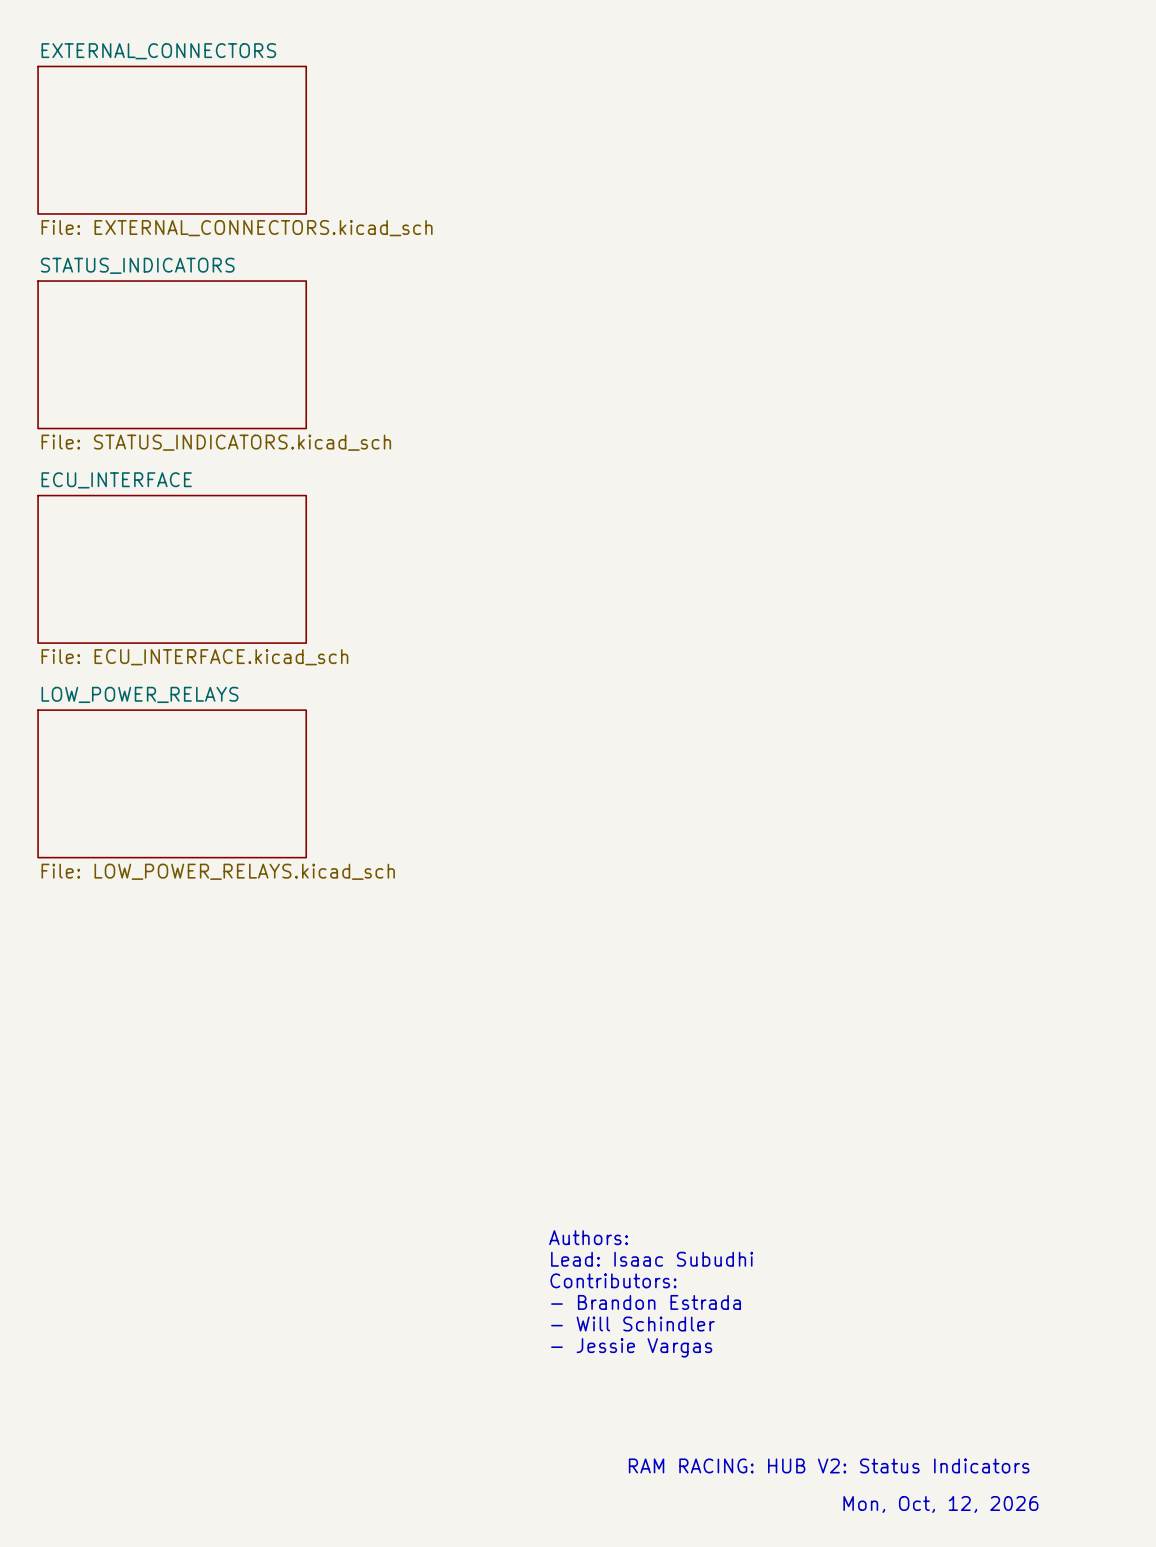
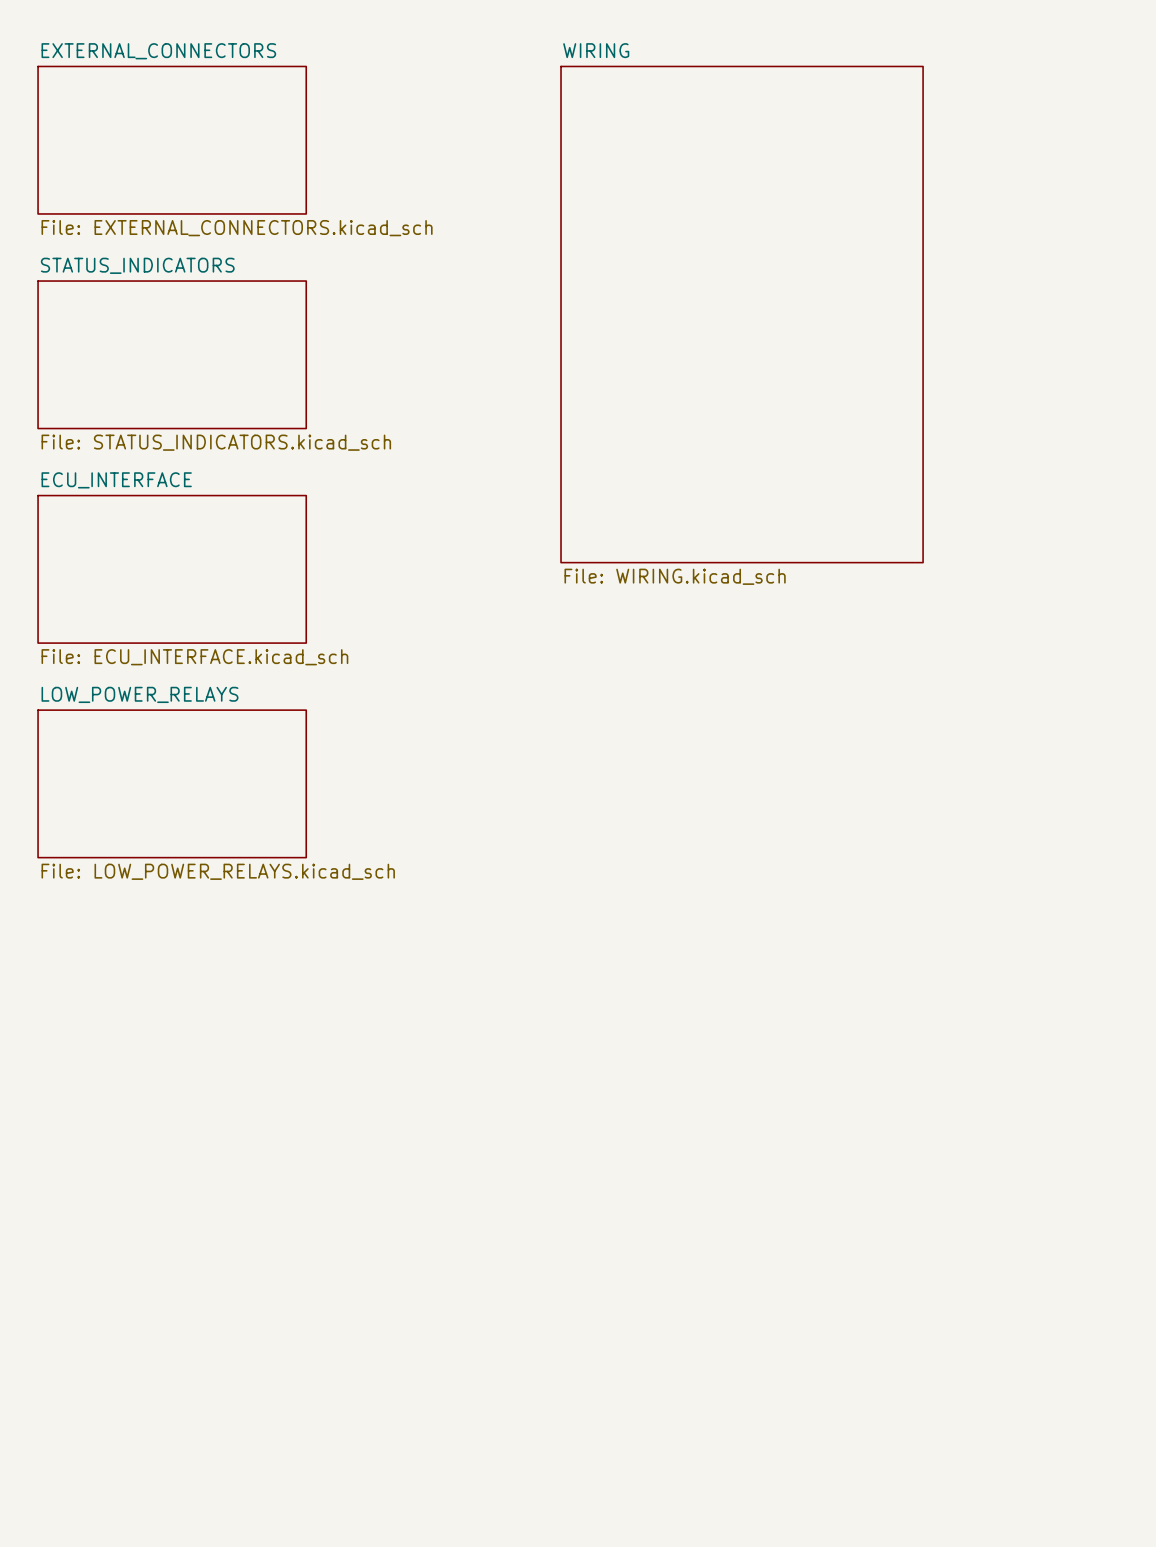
sheet WIRING: none -> File: WIRING.kicad_sch (742, 314)
text: Authors: (588, 1237) -> none
text: Lead: Isaac Subudhi (652, 1259) -> none
text: Contributors: (613, 1280) -> none
text: - Brandon Estrada (646, 1302) -> none
text: - Will Schindler (632, 1324) -> none
text: - Jessie Vargas (631, 1347) -> none
text: RAM RACING: HUB V2: Status Indicators (829, 1465) -> none
text: Mon, Oct, 12, 2026 (940, 1504) -> none

